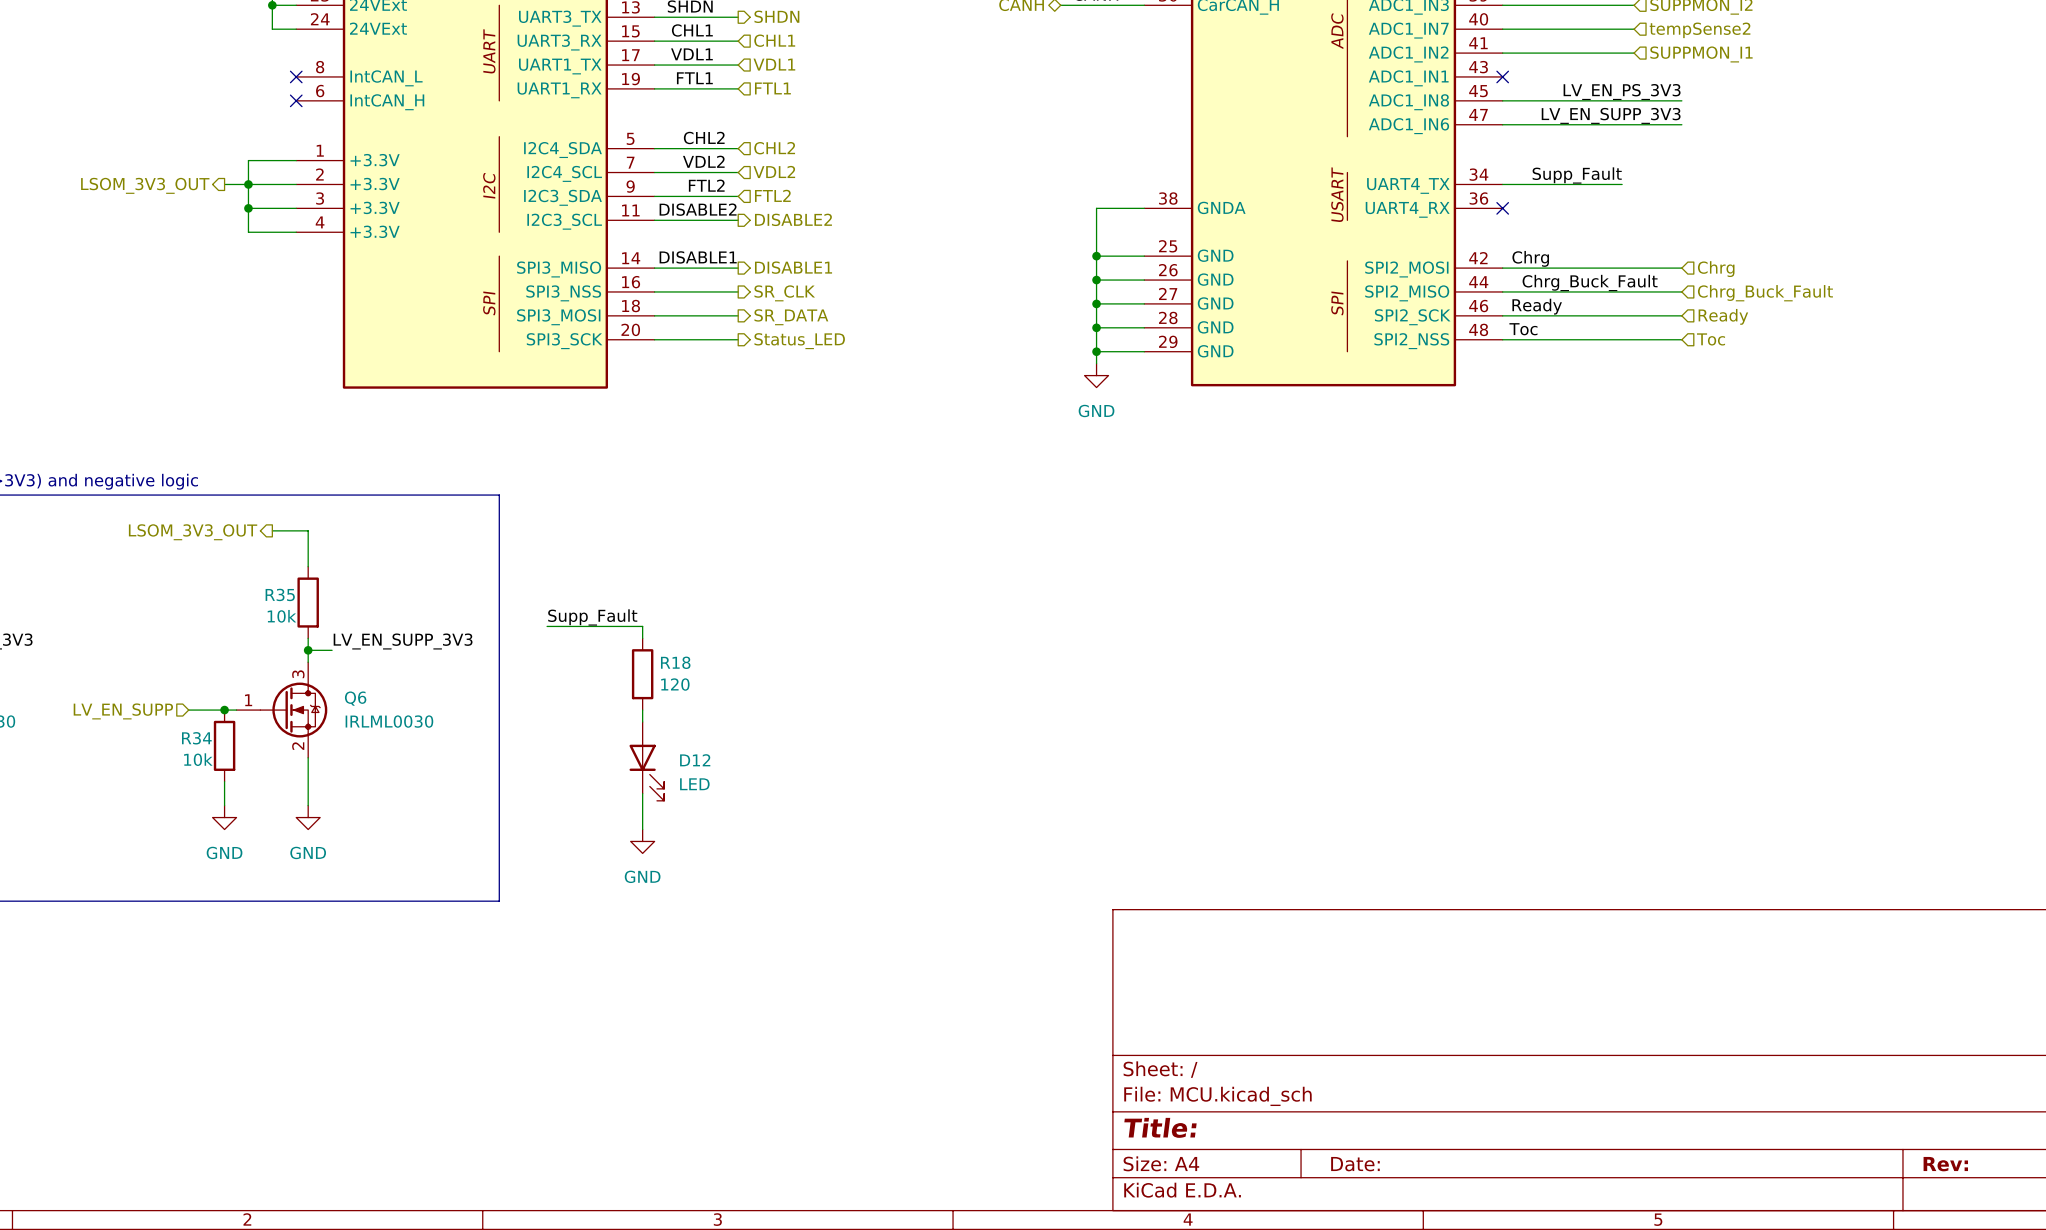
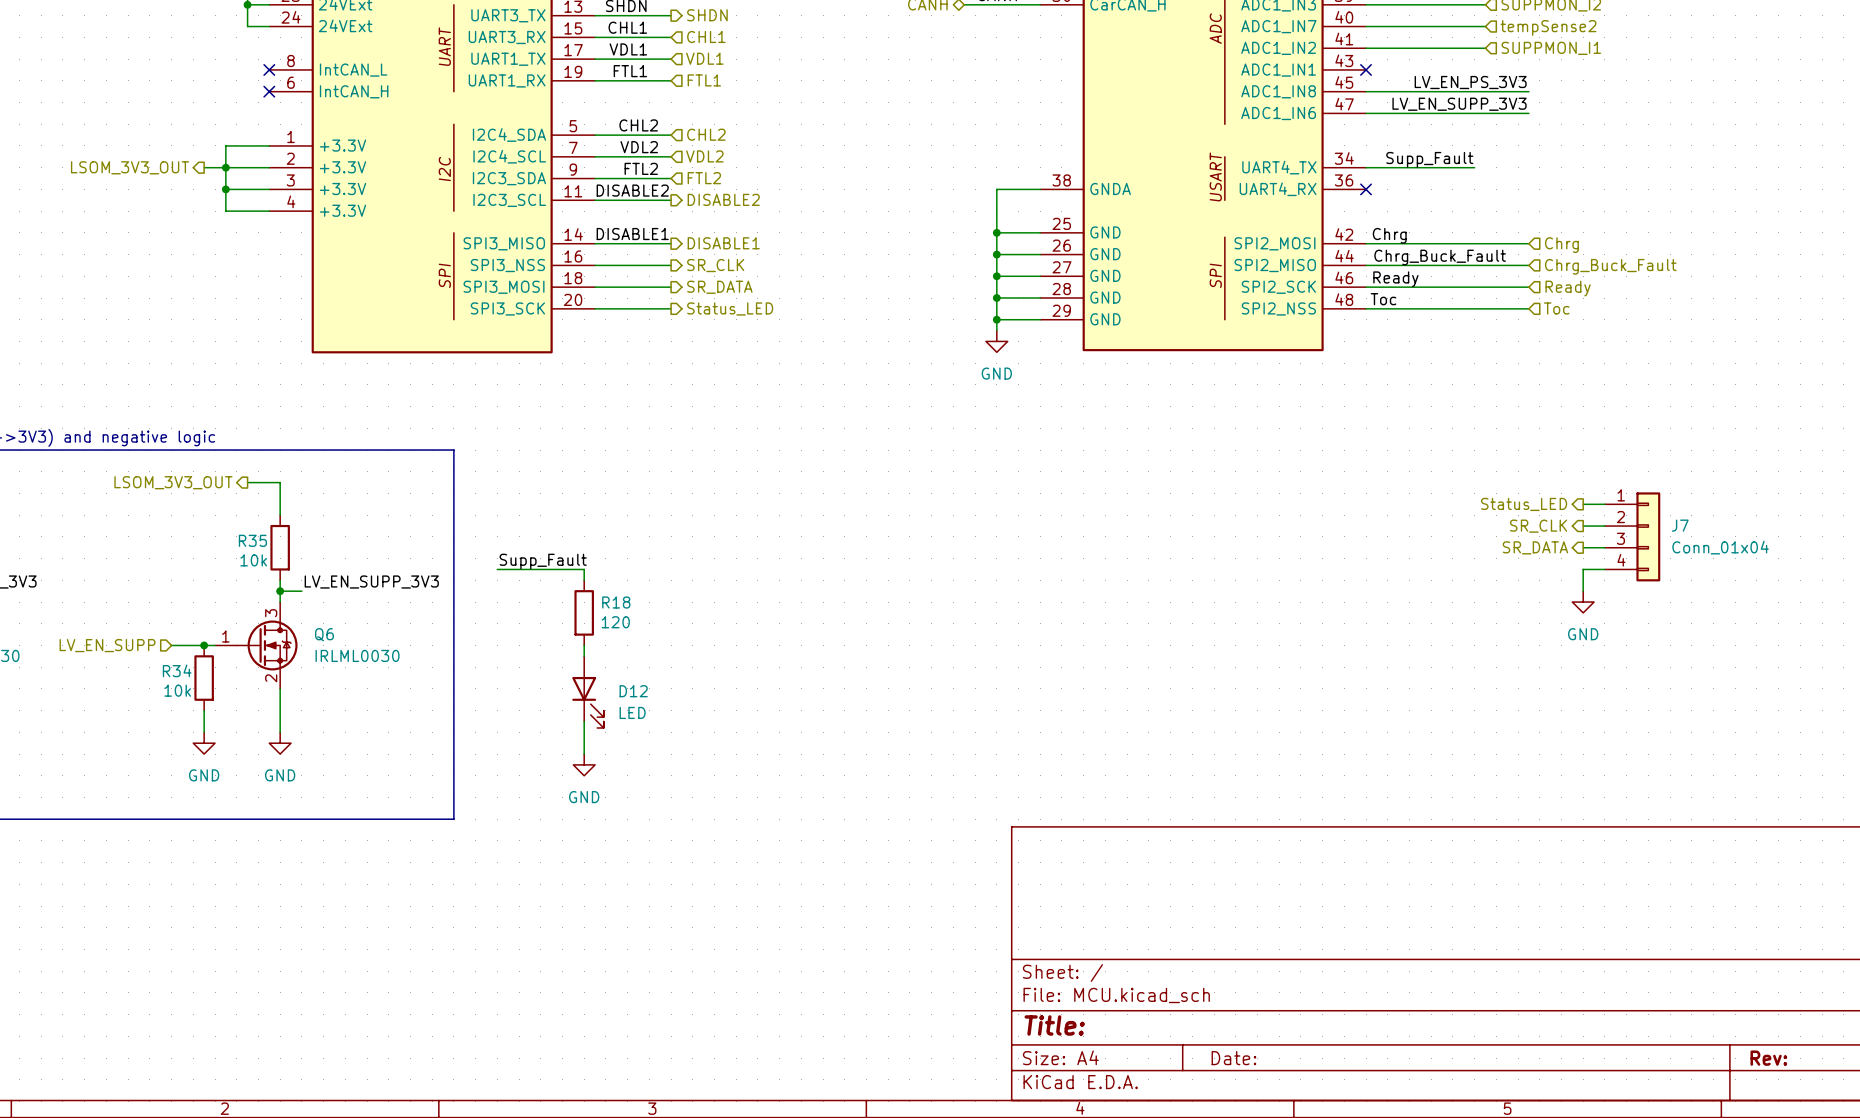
wire: none -> (1583, 504) (1604, 504)
hierarchical label: none -> Status_LED (1524, 504)
wire: none -> (1583, 526) (1604, 526)
hierarchical label: none -> SR_CLK (1538, 526)
J7: none -> Conn_01x04 (1632, 536)
wire: none -> (1583, 547) (1604, 547)
hierarchical label: none -> SR_DATA (1535, 547)
wire: none -> (1604, 569) (1583, 569) (1583, 591)
power symbol: none -> GND (1583, 602)

